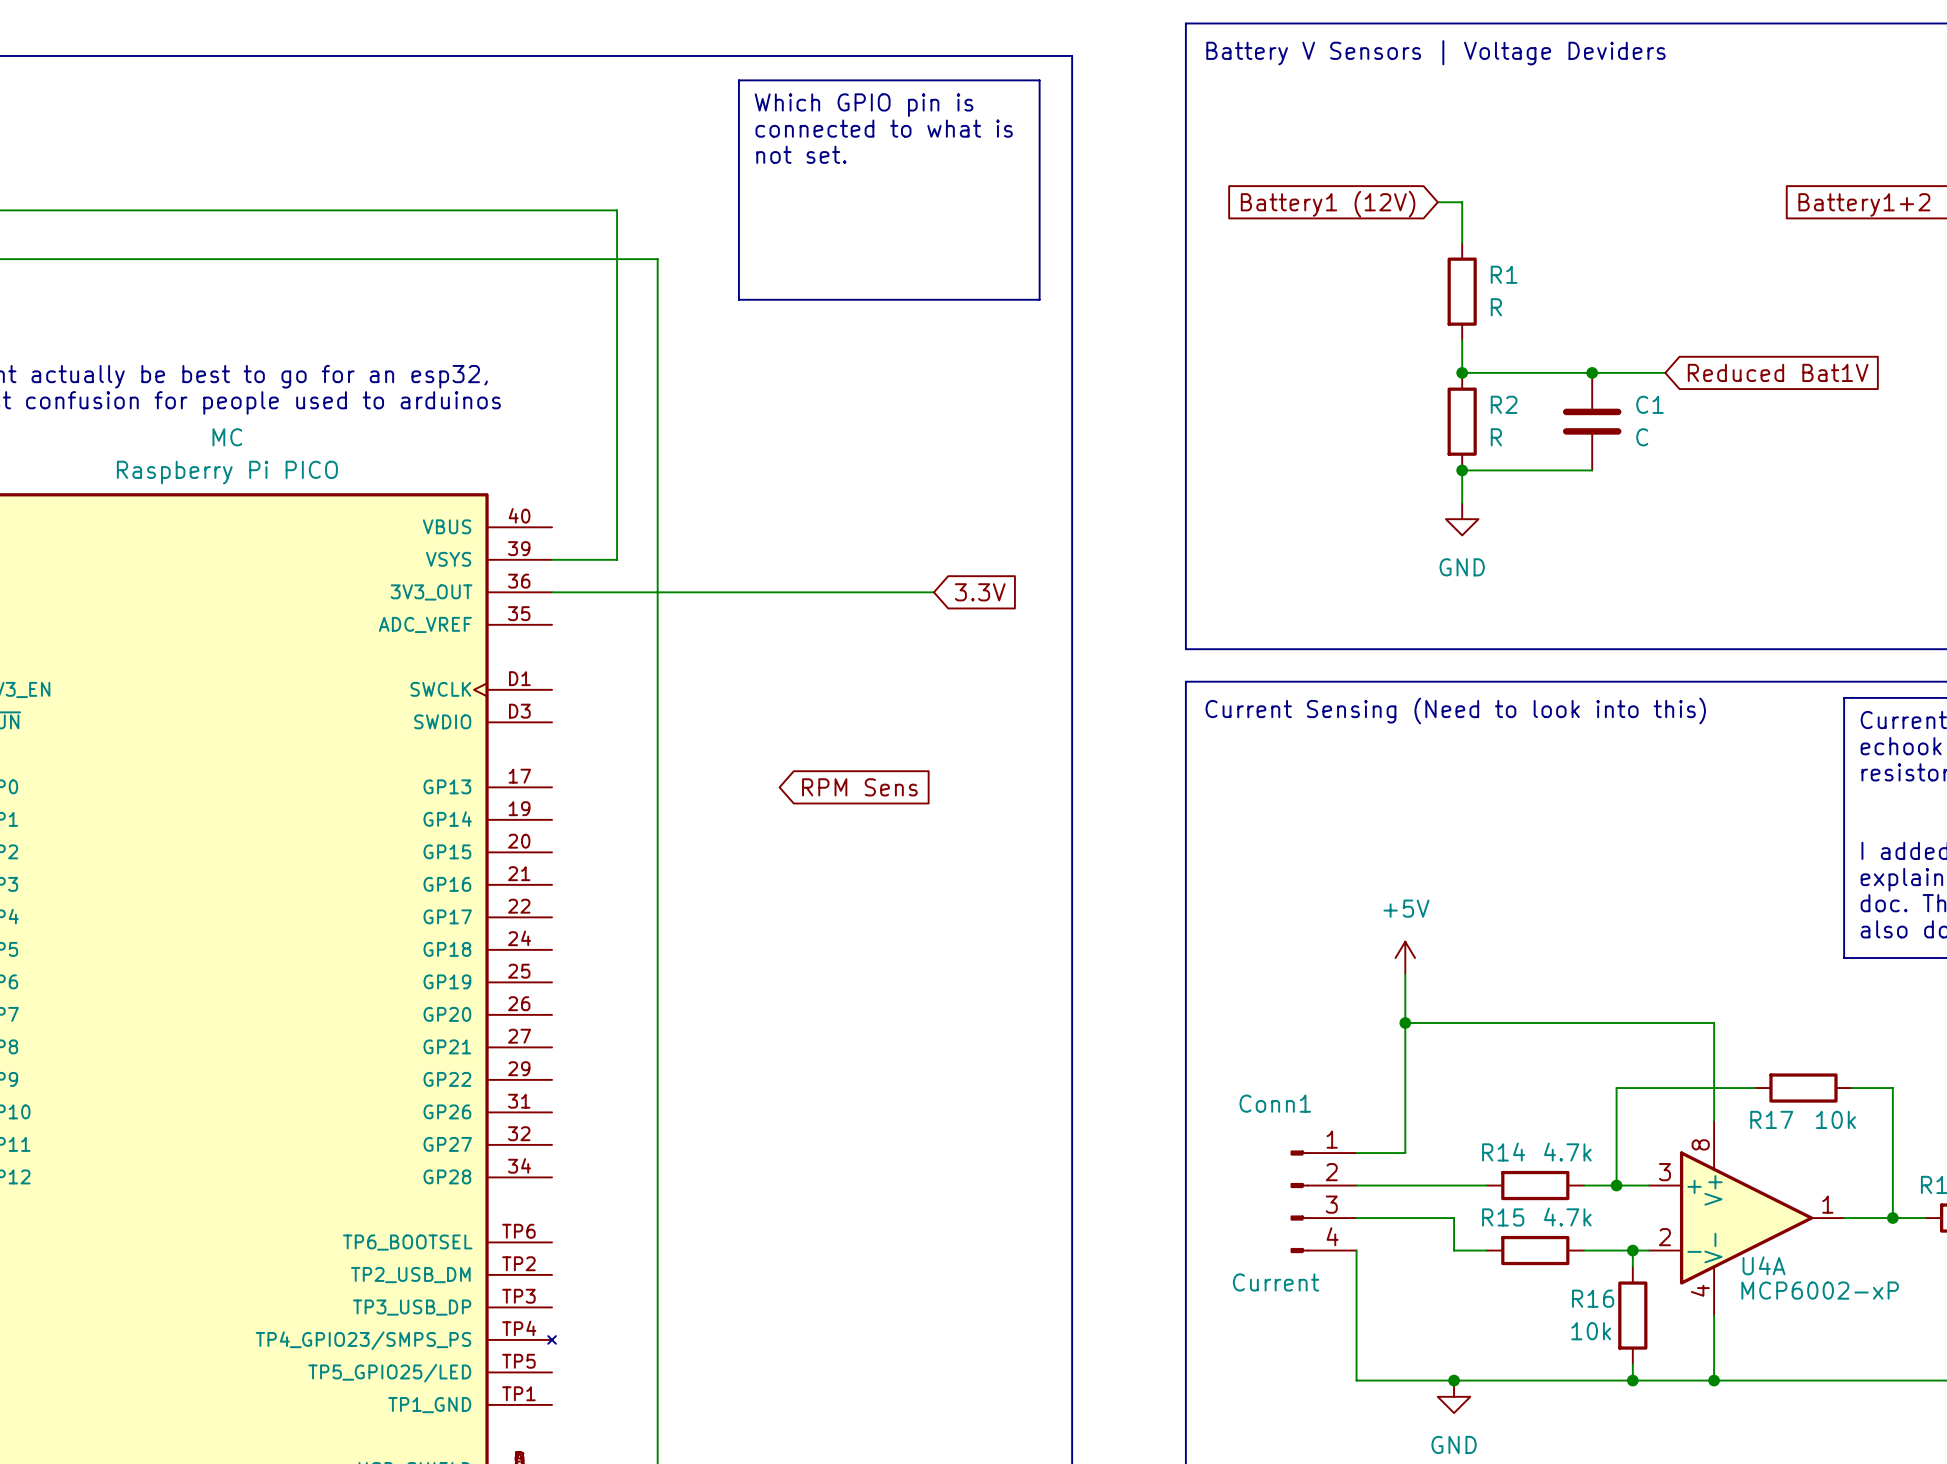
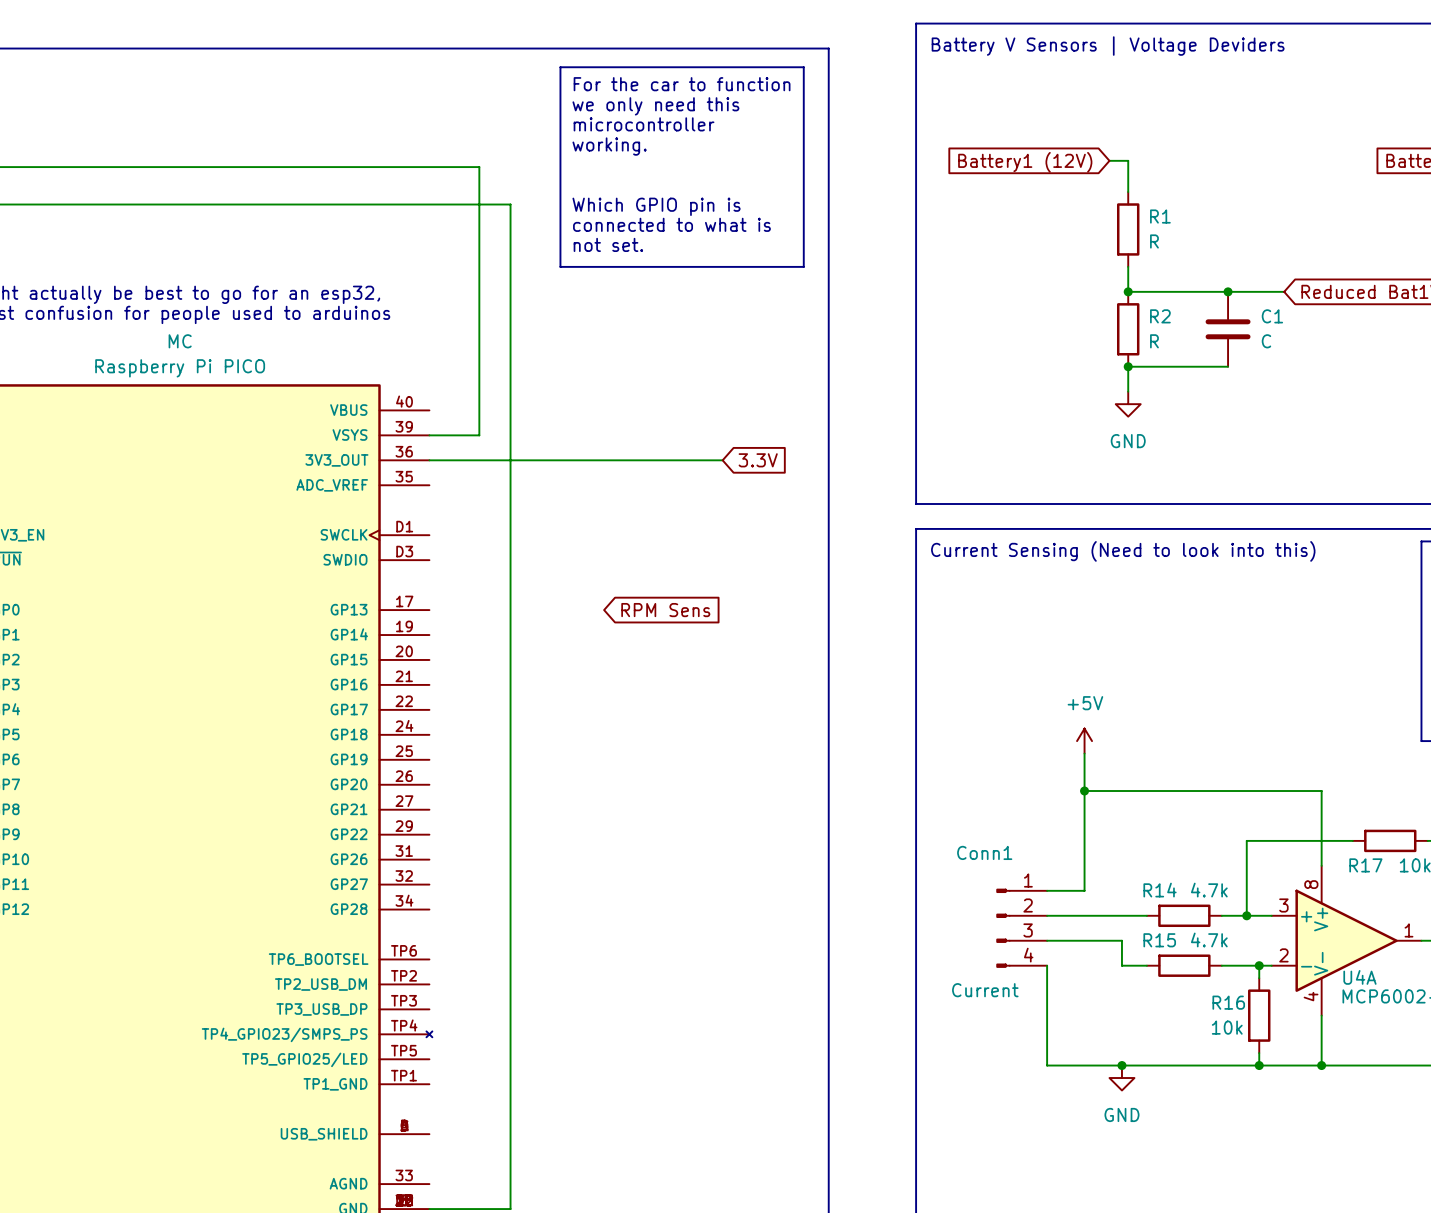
line: (738, 80) (738, 299) (1039, 299) -> (572, 67) (560, 67) (560, 266) (803, 266) (803, 235)
text: none -> For the car to function (682, 84)
text position: Which GPIO pin is (864, 105) -> Which GPIO pin is (656, 206)
text position: connected to what is (884, 128) -> connected to what is (671, 224)
text: none -> we only need this (655, 106)
text position: not set. (801, 154) -> not set. (608, 244)
text: none -> microcontroller (644, 124)
text: none -> working. (609, 146)

